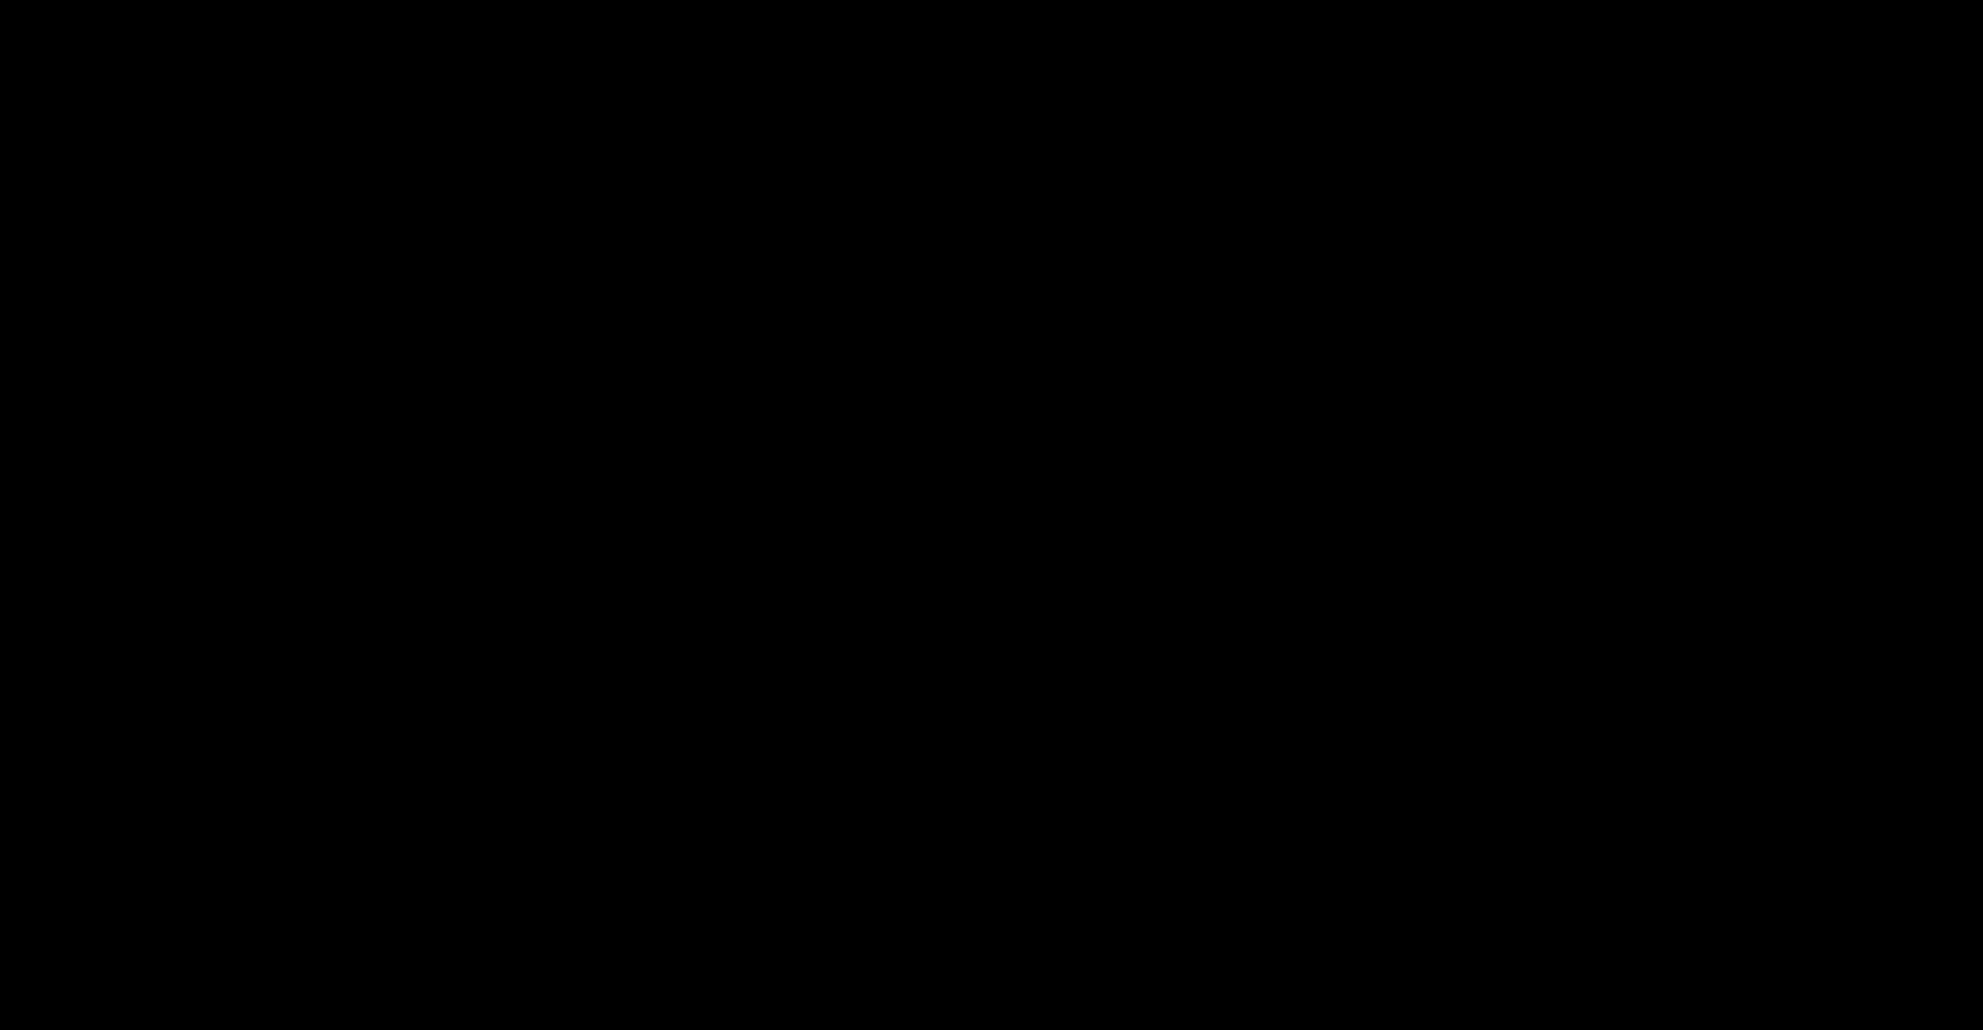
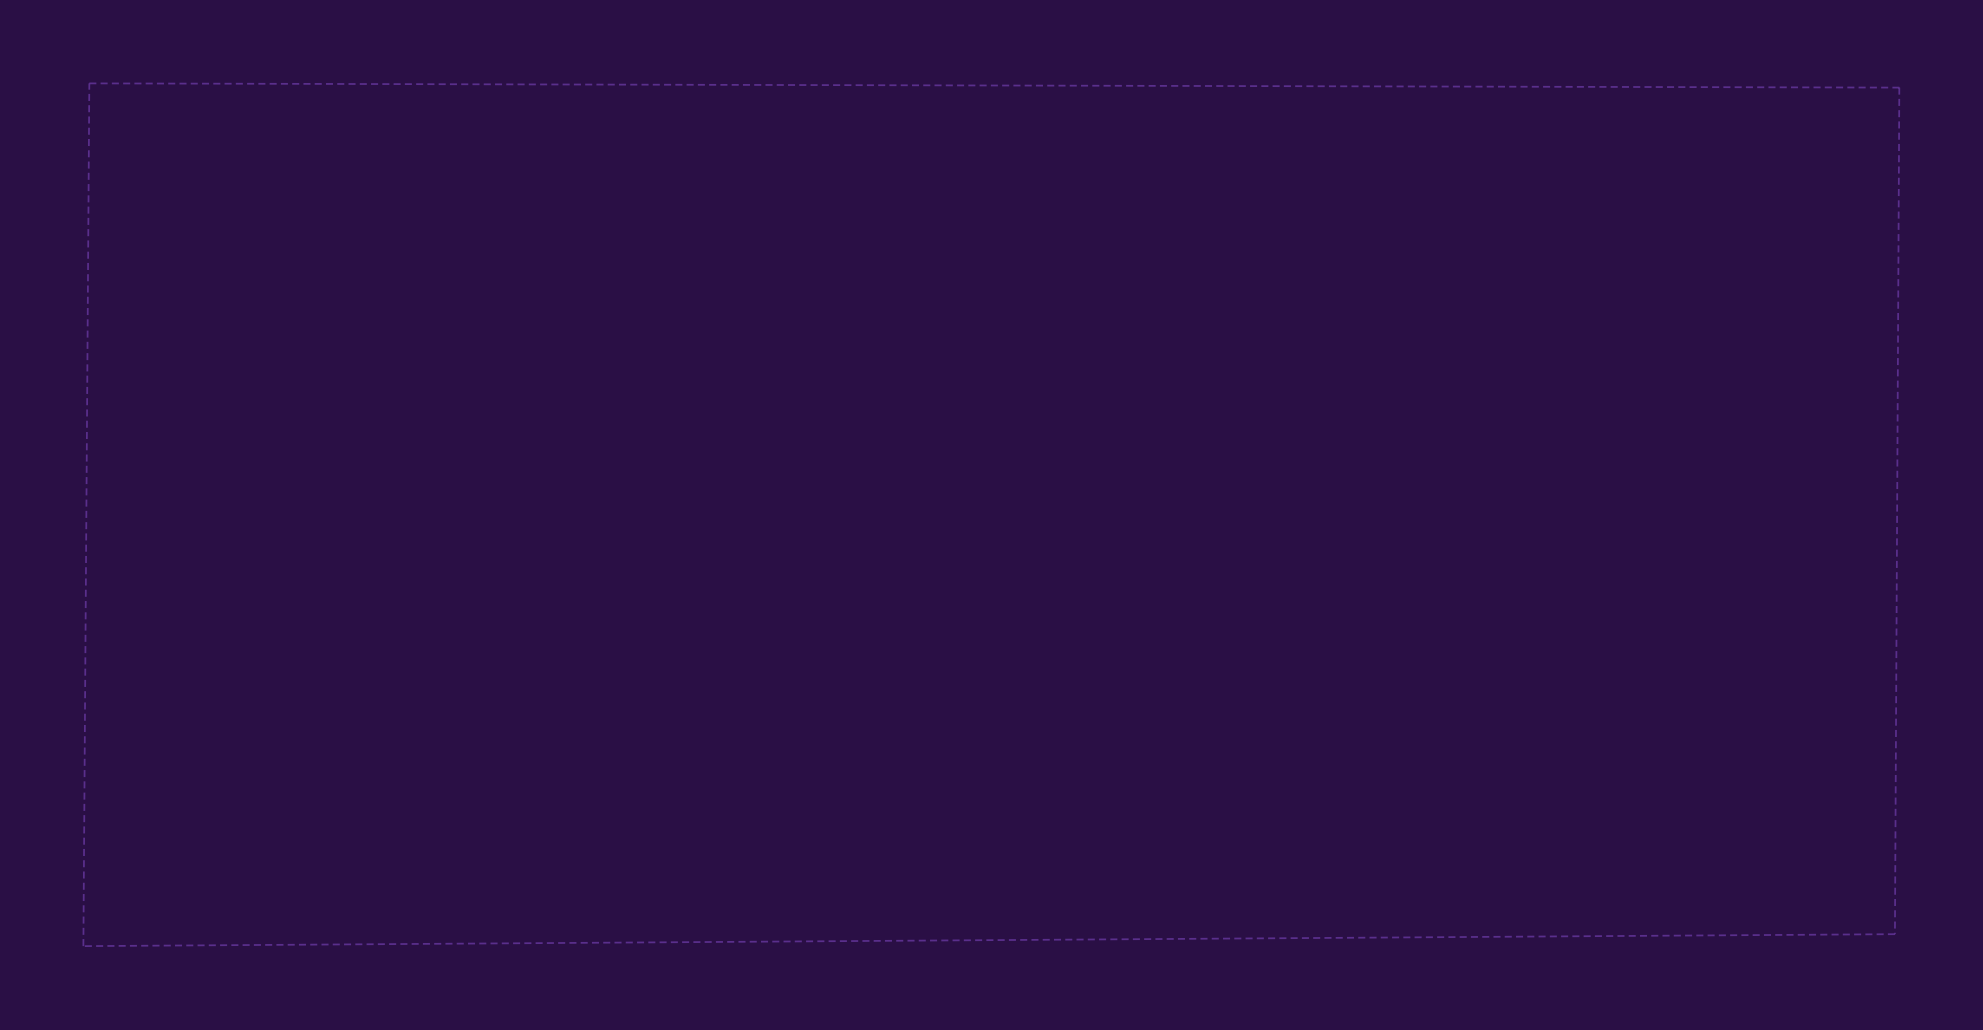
zone outline: none -> (89, 83) (83, 946) (1894, 934) (1899, 87) (89, 83)

